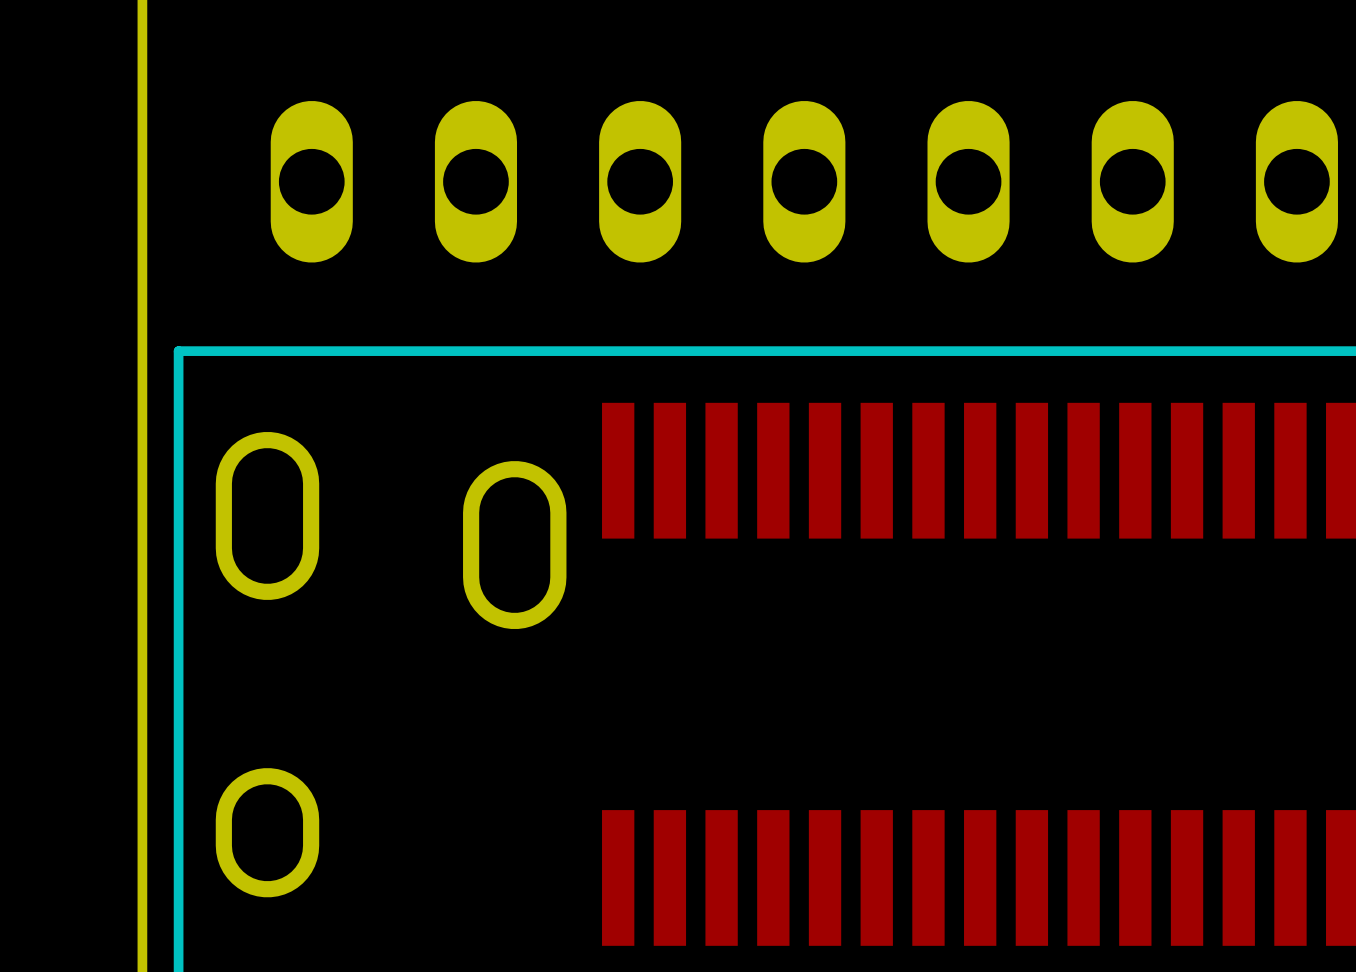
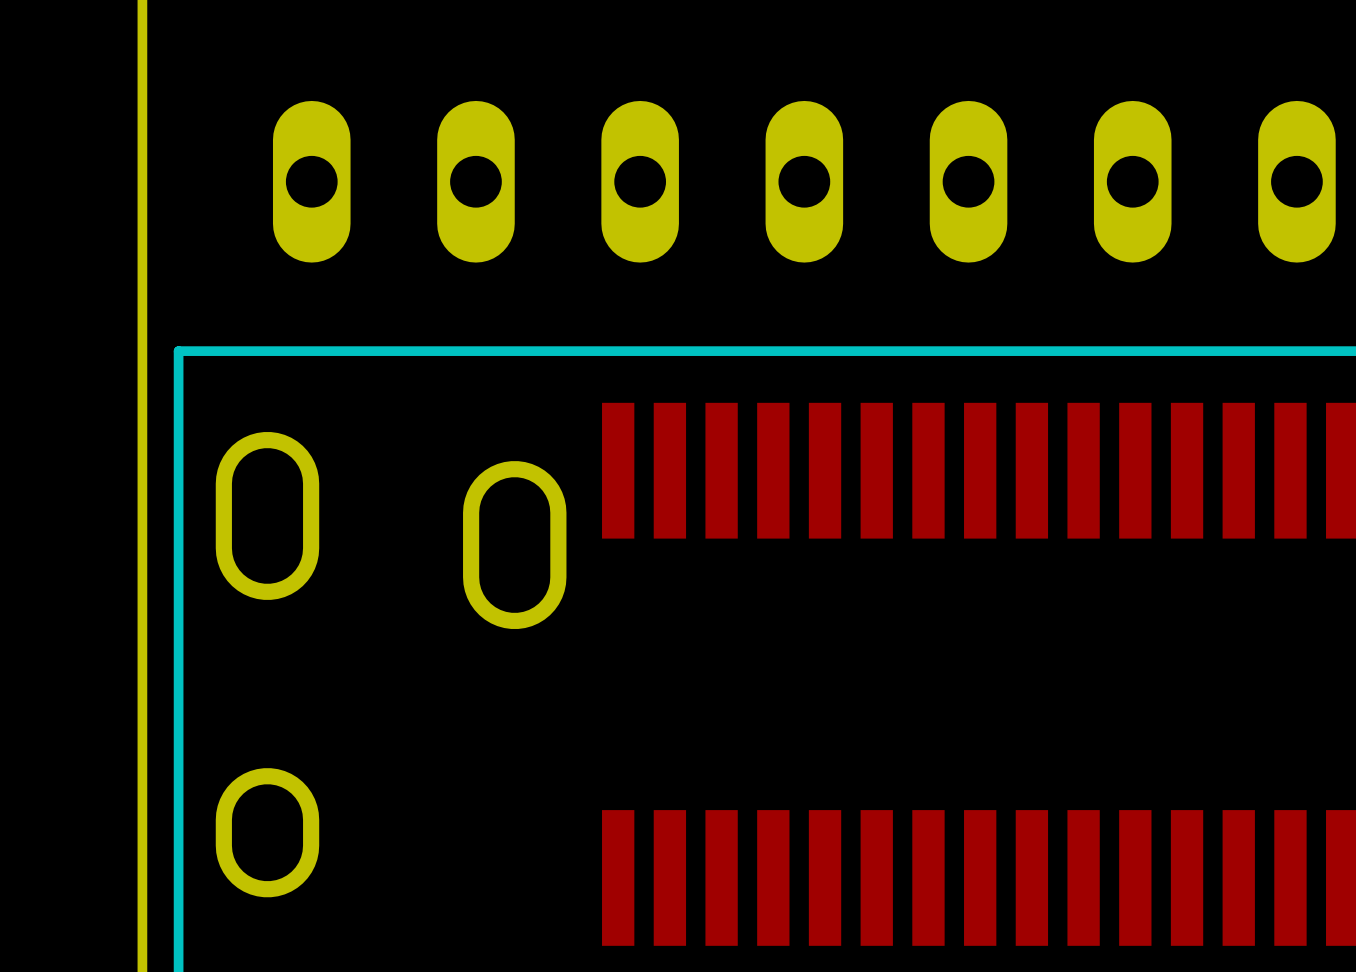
part footprint: [270, 100, 353, 263] -> [272, 100, 351, 263]
part footprint: [434, 100, 518, 263] -> [437, 100, 515, 263]
part footprint: [599, 100, 682, 263] -> [601, 100, 679, 263]
part footprint: [763, 100, 846, 263] -> [765, 100, 844, 263]
part footprint: [927, 100, 1010, 263] -> [929, 100, 1008, 263]
part footprint: [1091, 100, 1174, 263] -> [1093, 100, 1172, 263]
part footprint: [1255, 100, 1338, 263] -> [1258, 100, 1336, 263]

